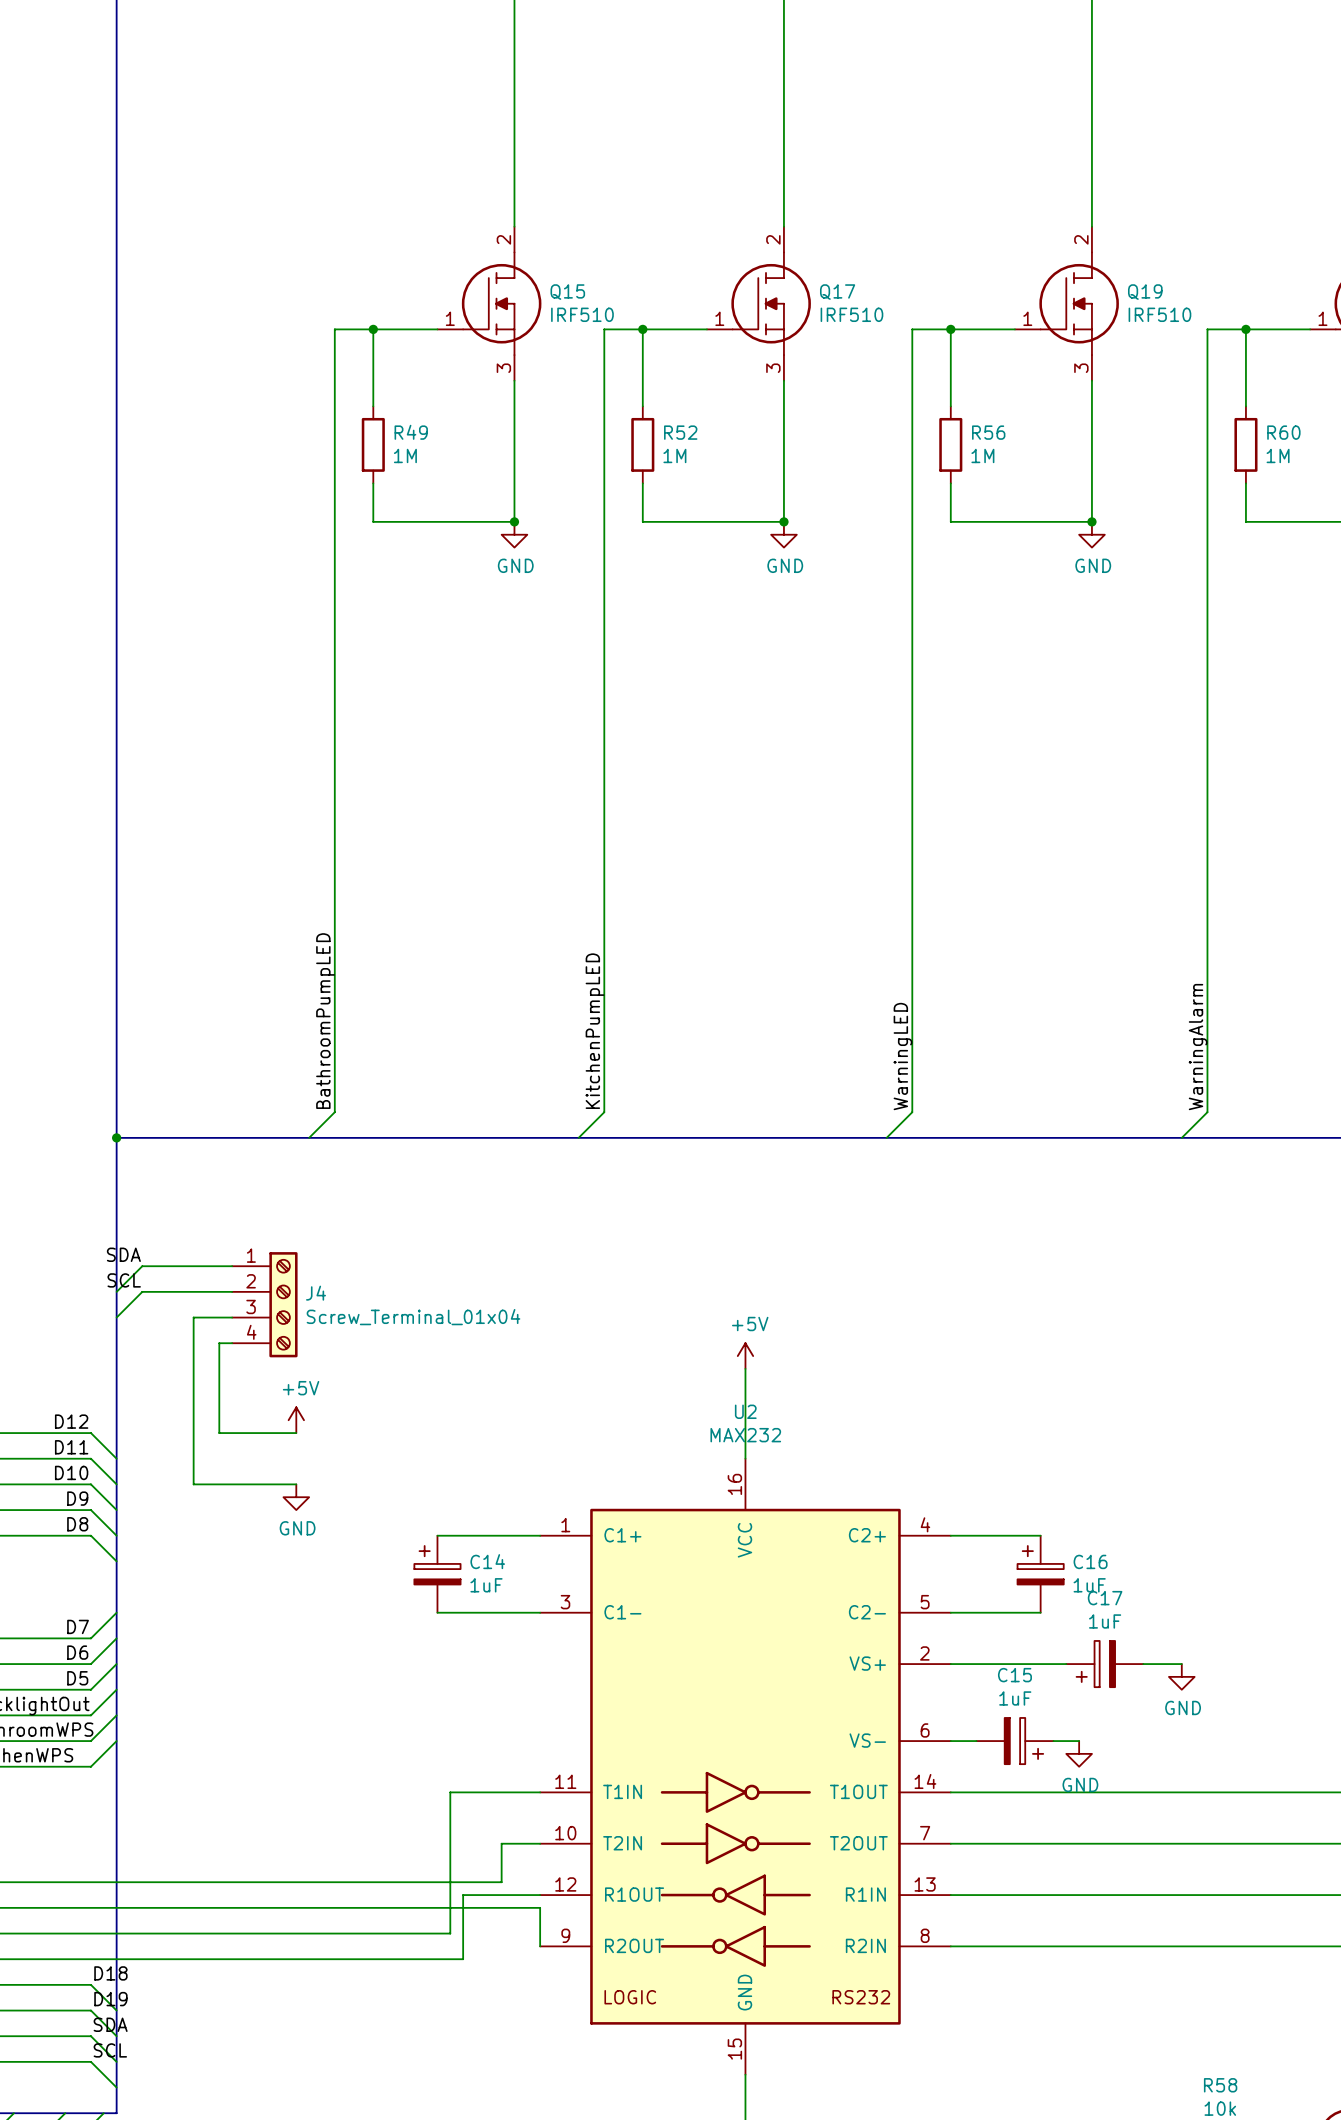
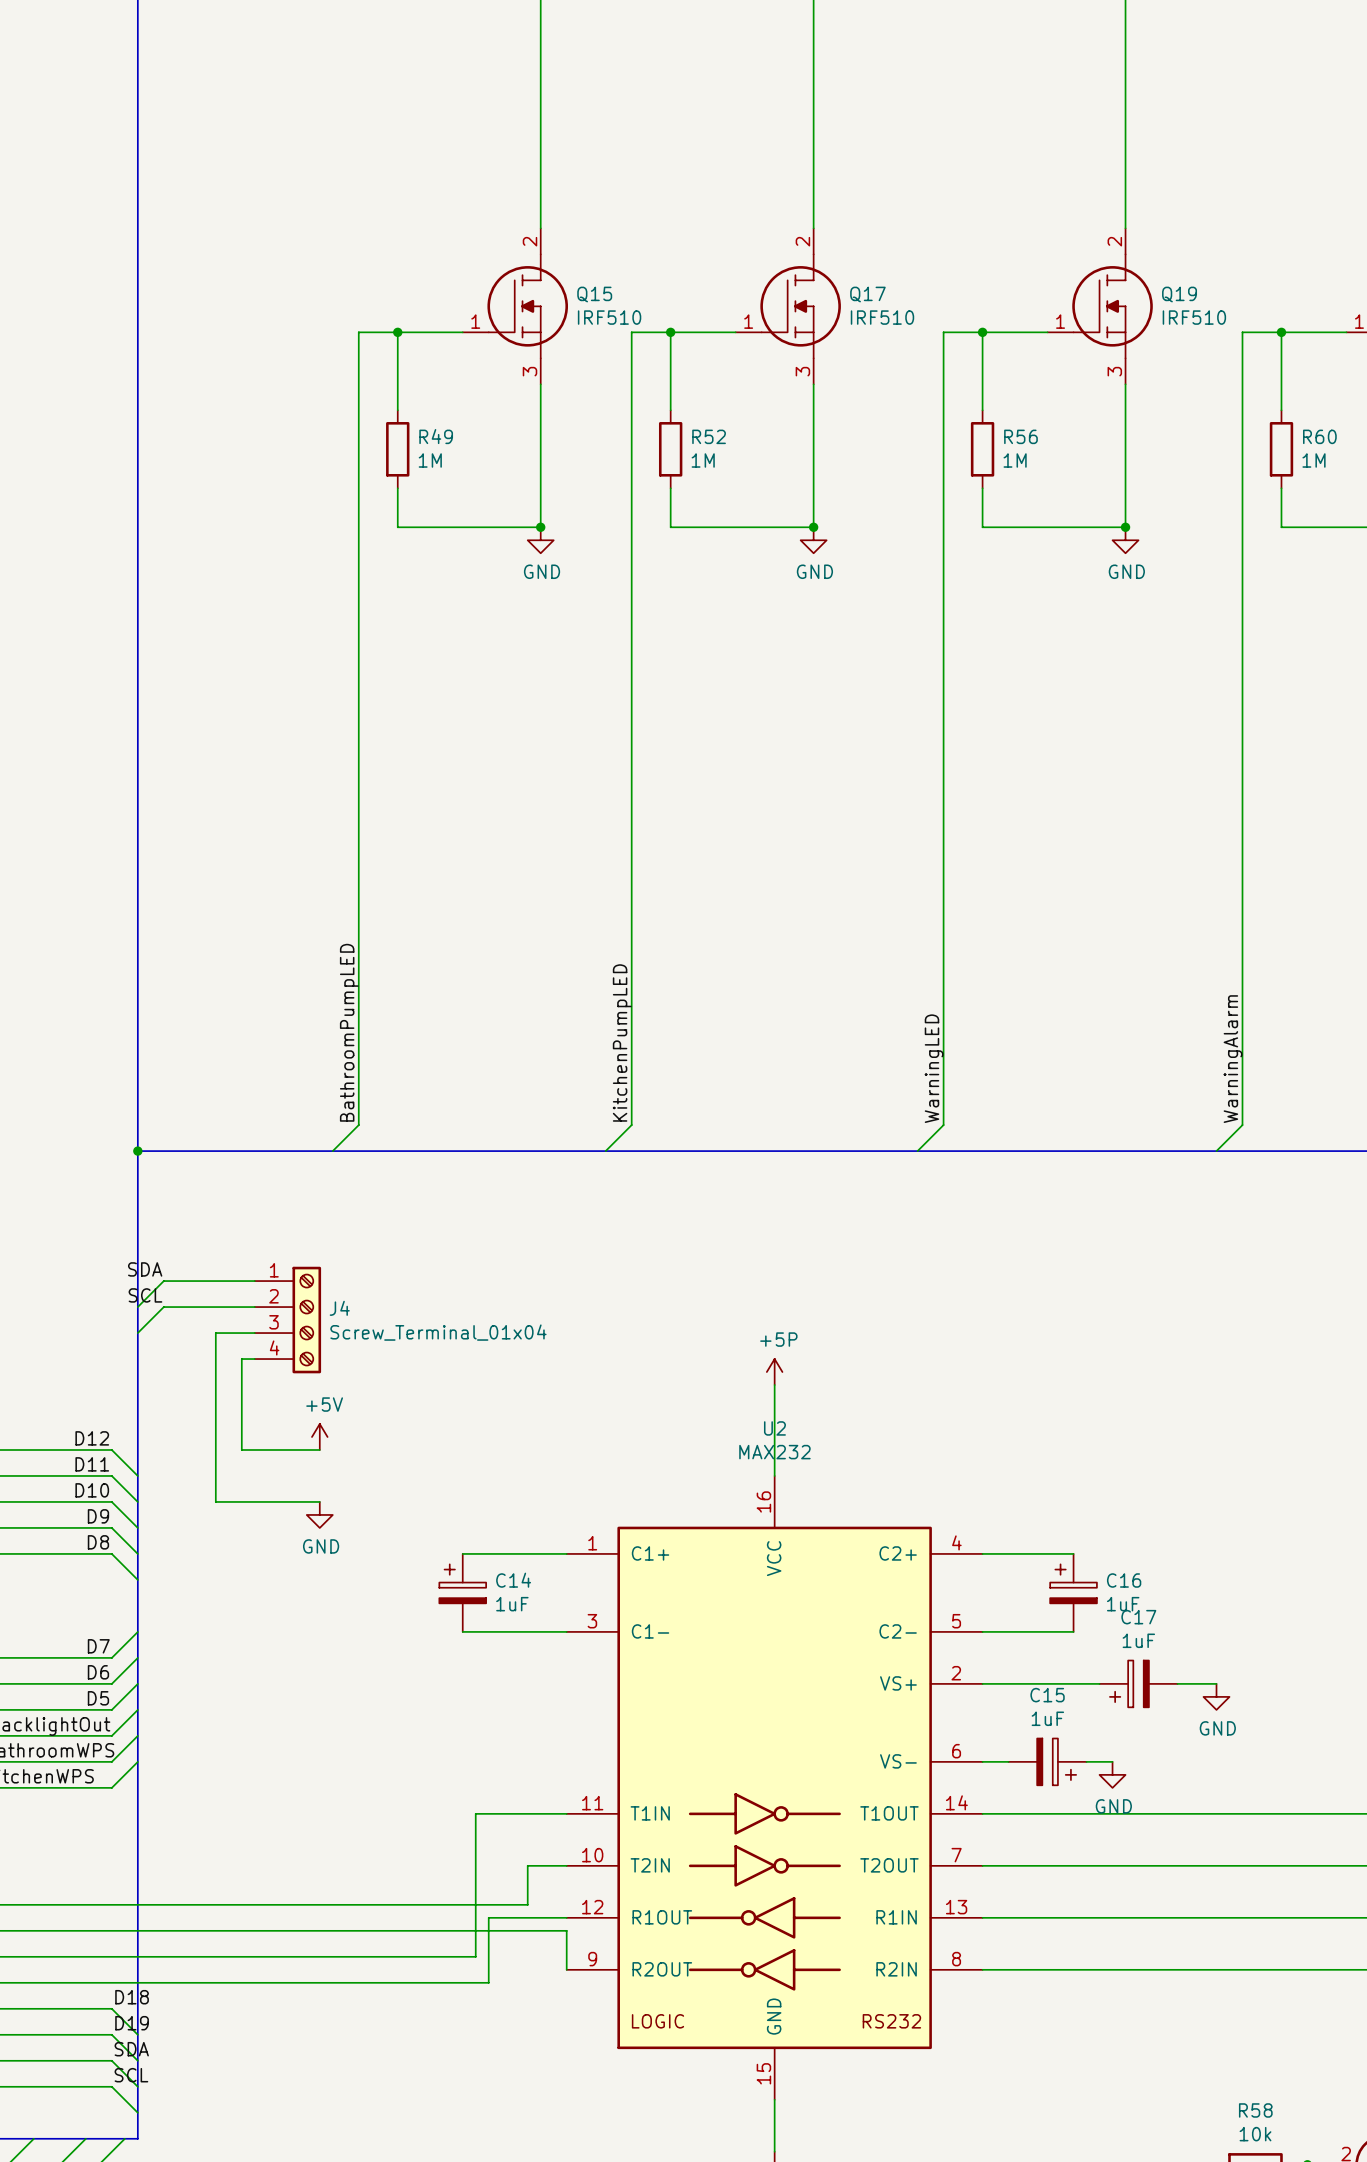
power symbol: +5V (745, 1356) -> +5P (774, 1372)

